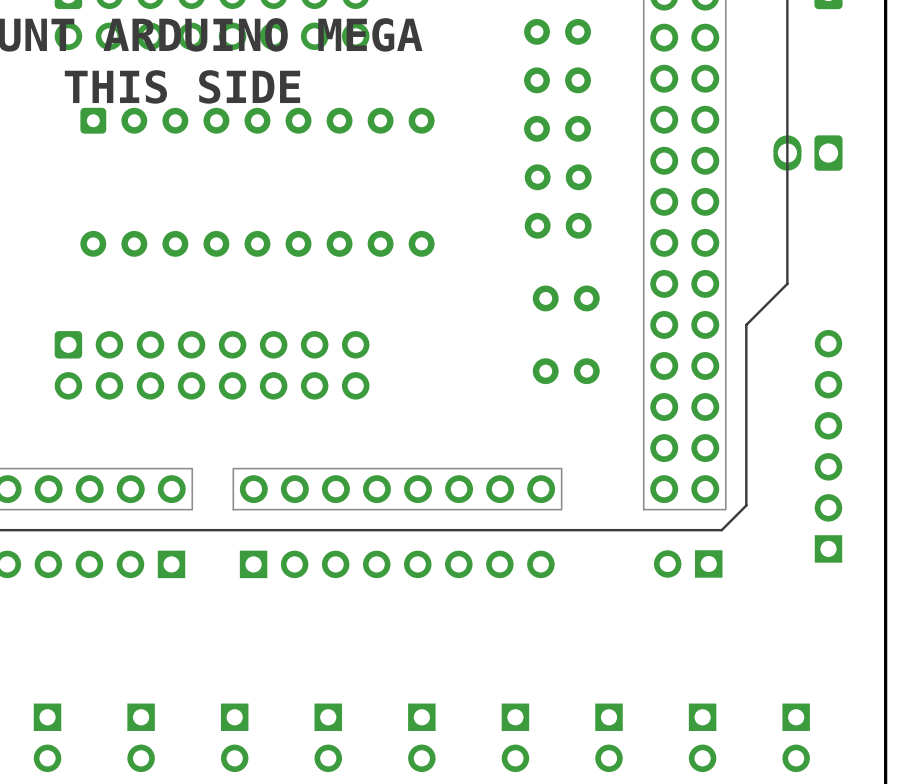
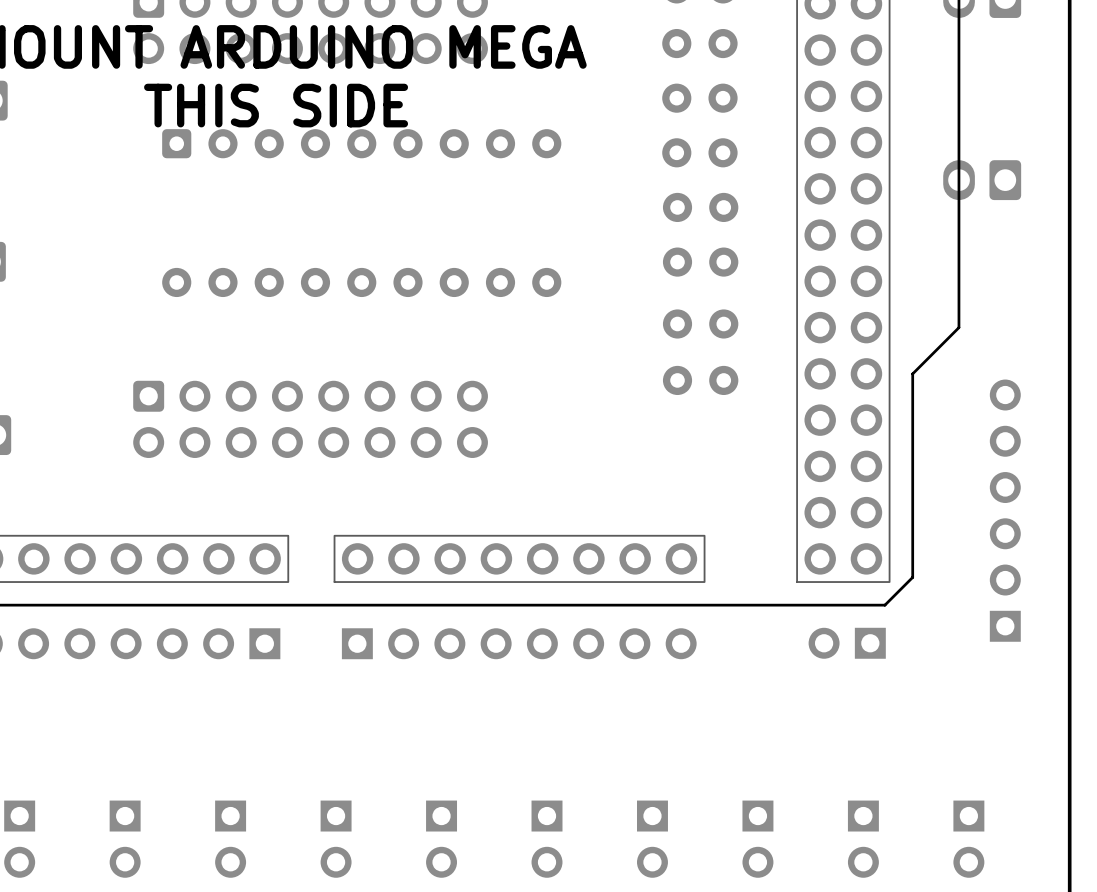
part: none -> (700, 323)
part: (566, 298) -> none
part: none -> (700, 380)
part: (566, 371) -> none

